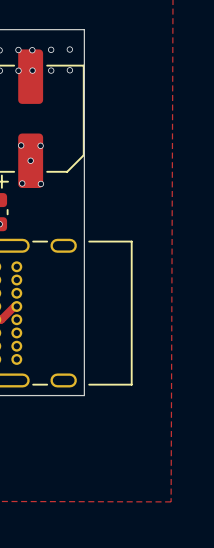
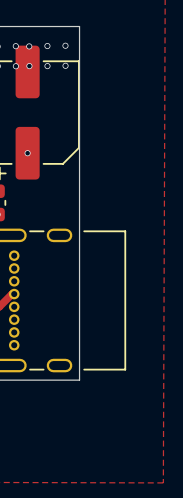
via: (21, 145) -> none
via: (40, 145) -> none
via: (22, 183) -> none
via: (40, 183) -> none

